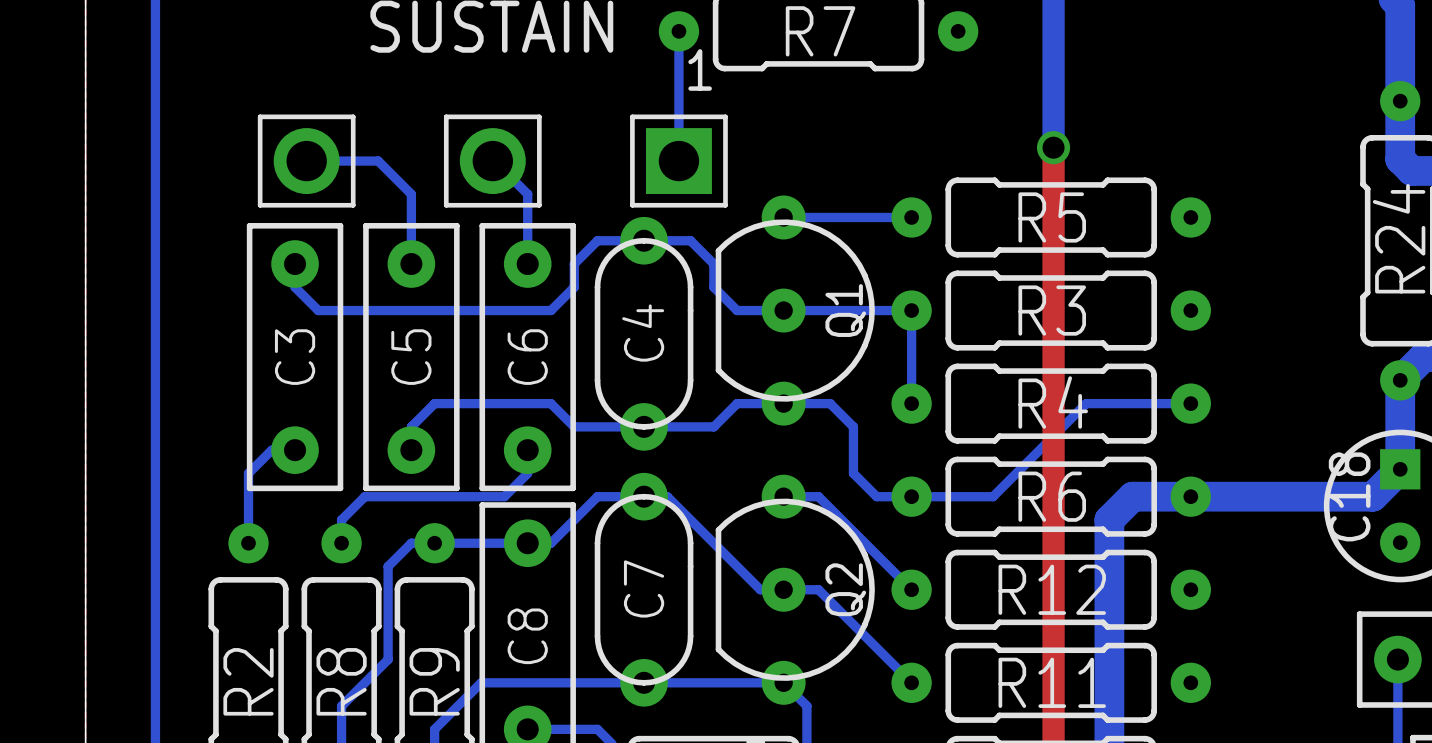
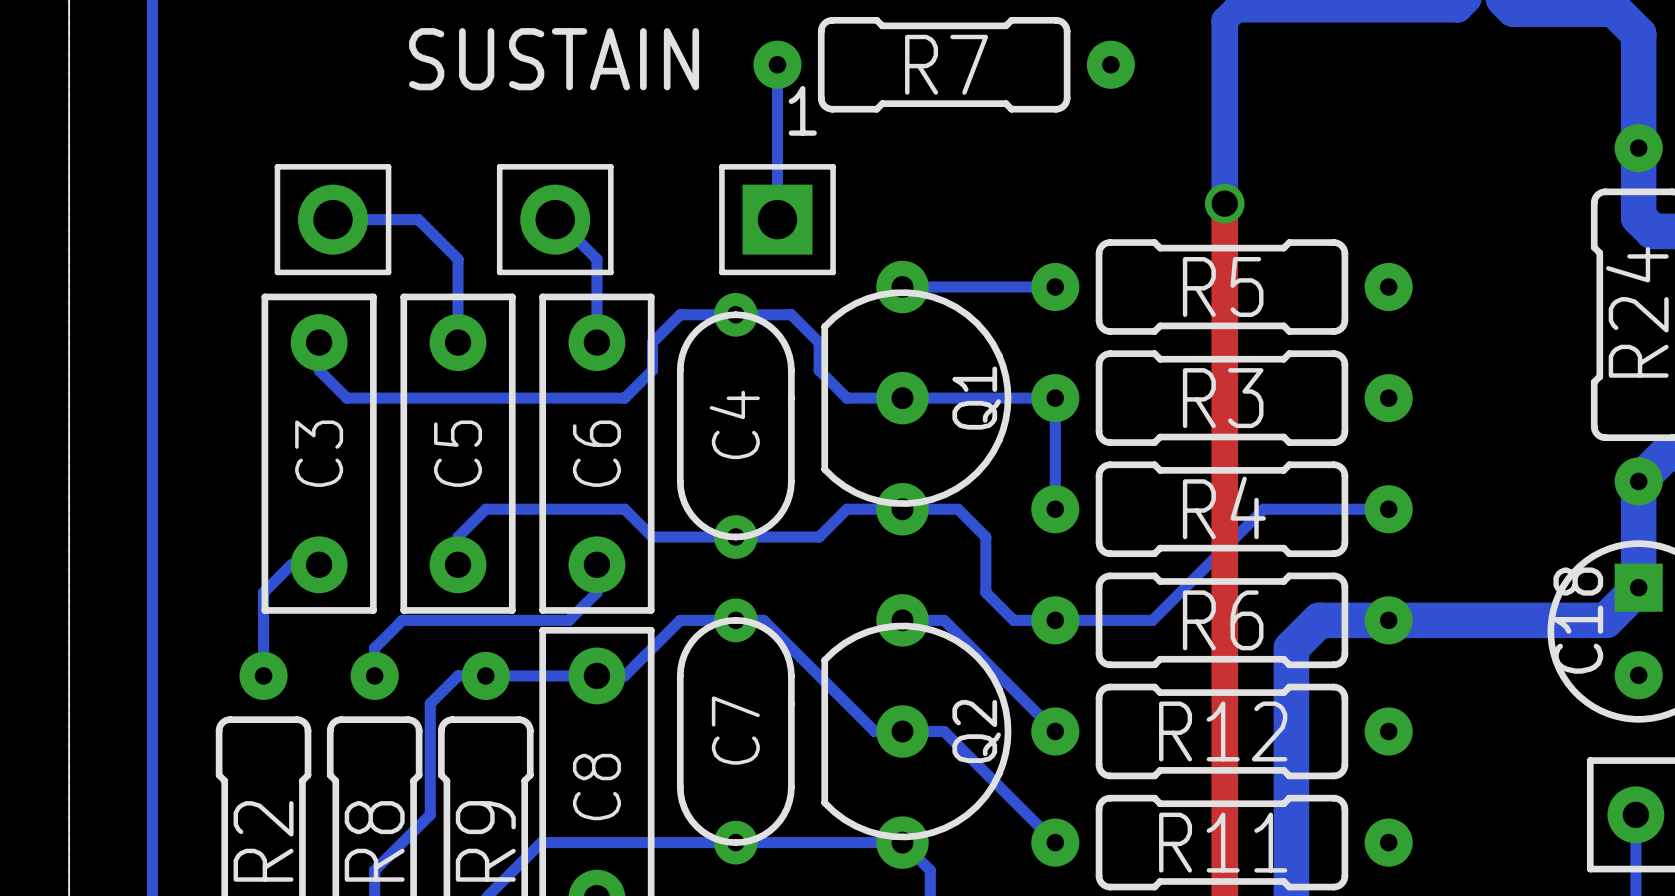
SUSTAIN footprint: [257, 114, 728, 208] -> [274, 164, 836, 276]
C4 footprint: [594, 216, 694, 451] -> [676, 292, 795, 559]
C7 footprint: [594, 472, 694, 707] -> [676, 598, 795, 865]

